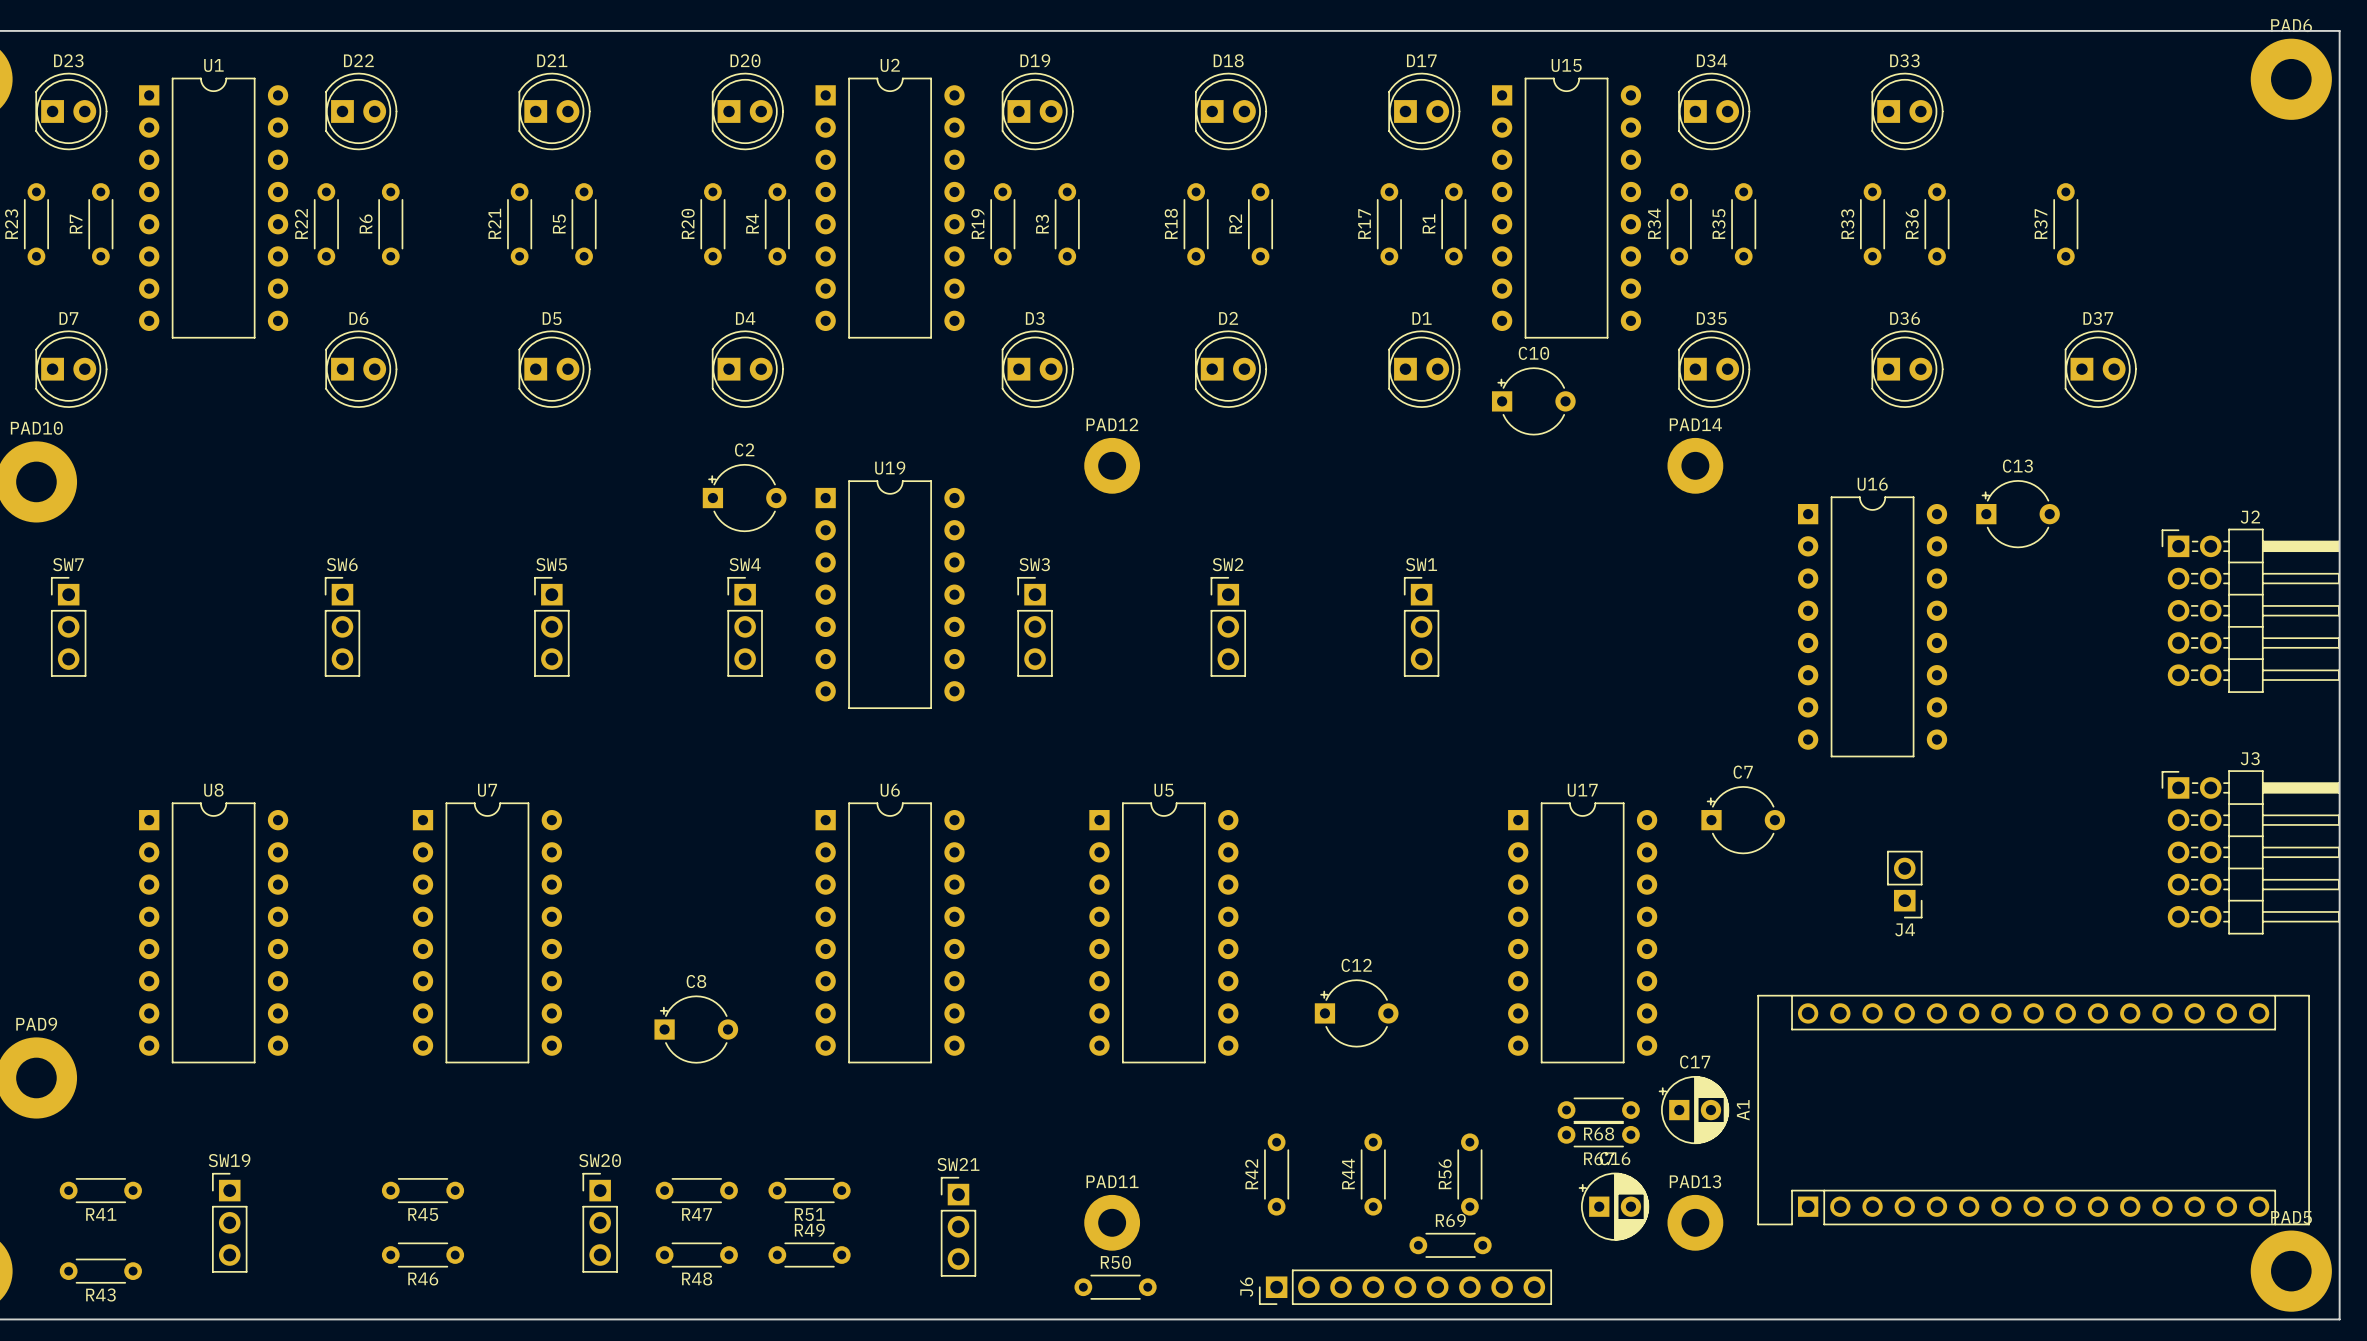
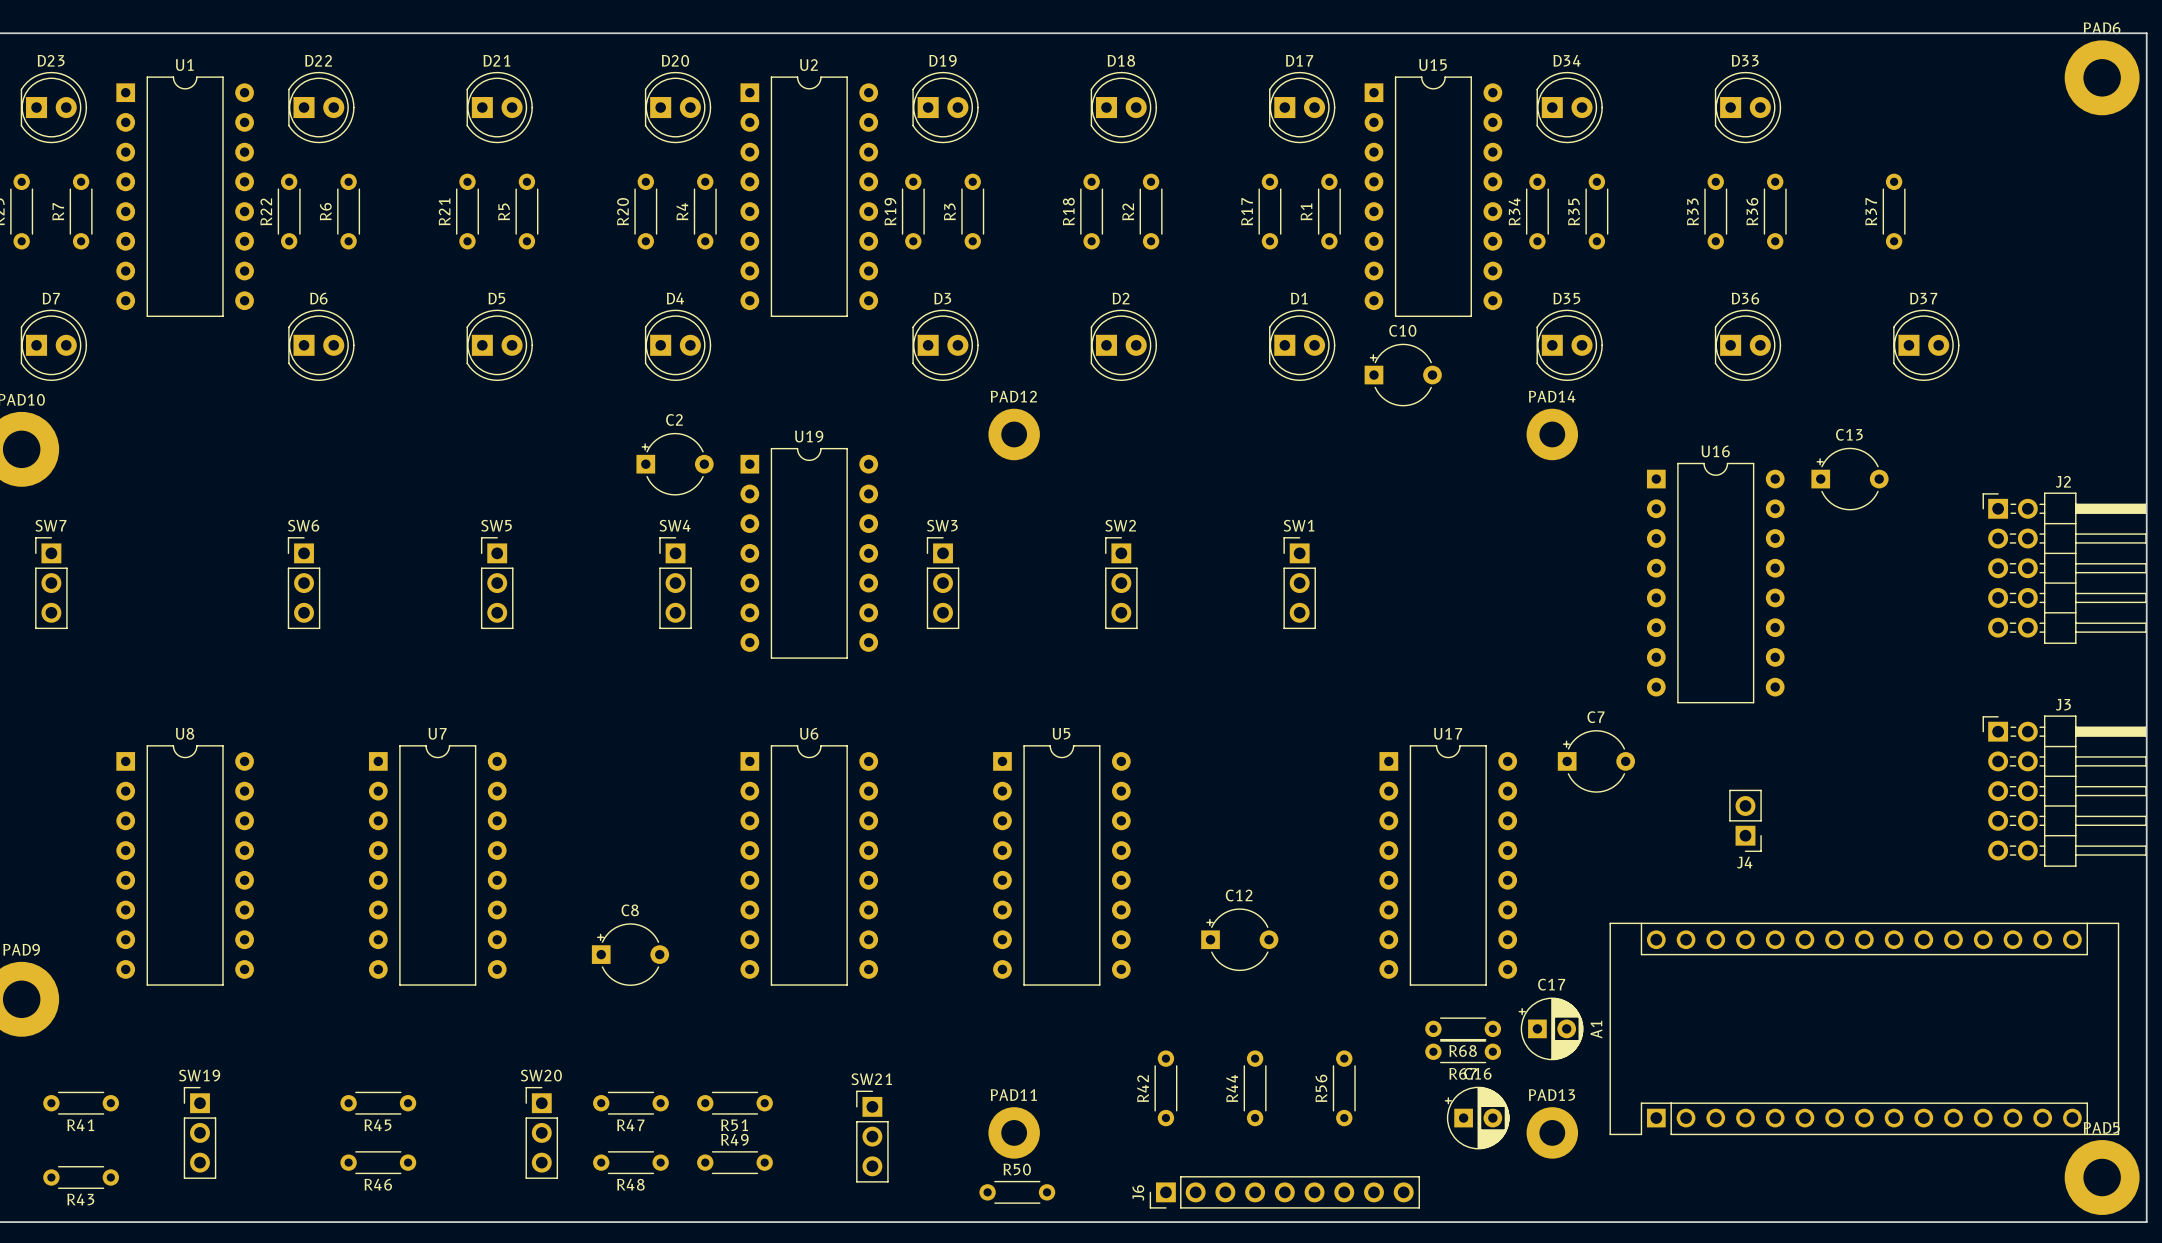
R69: (1450, 1245) -> none

